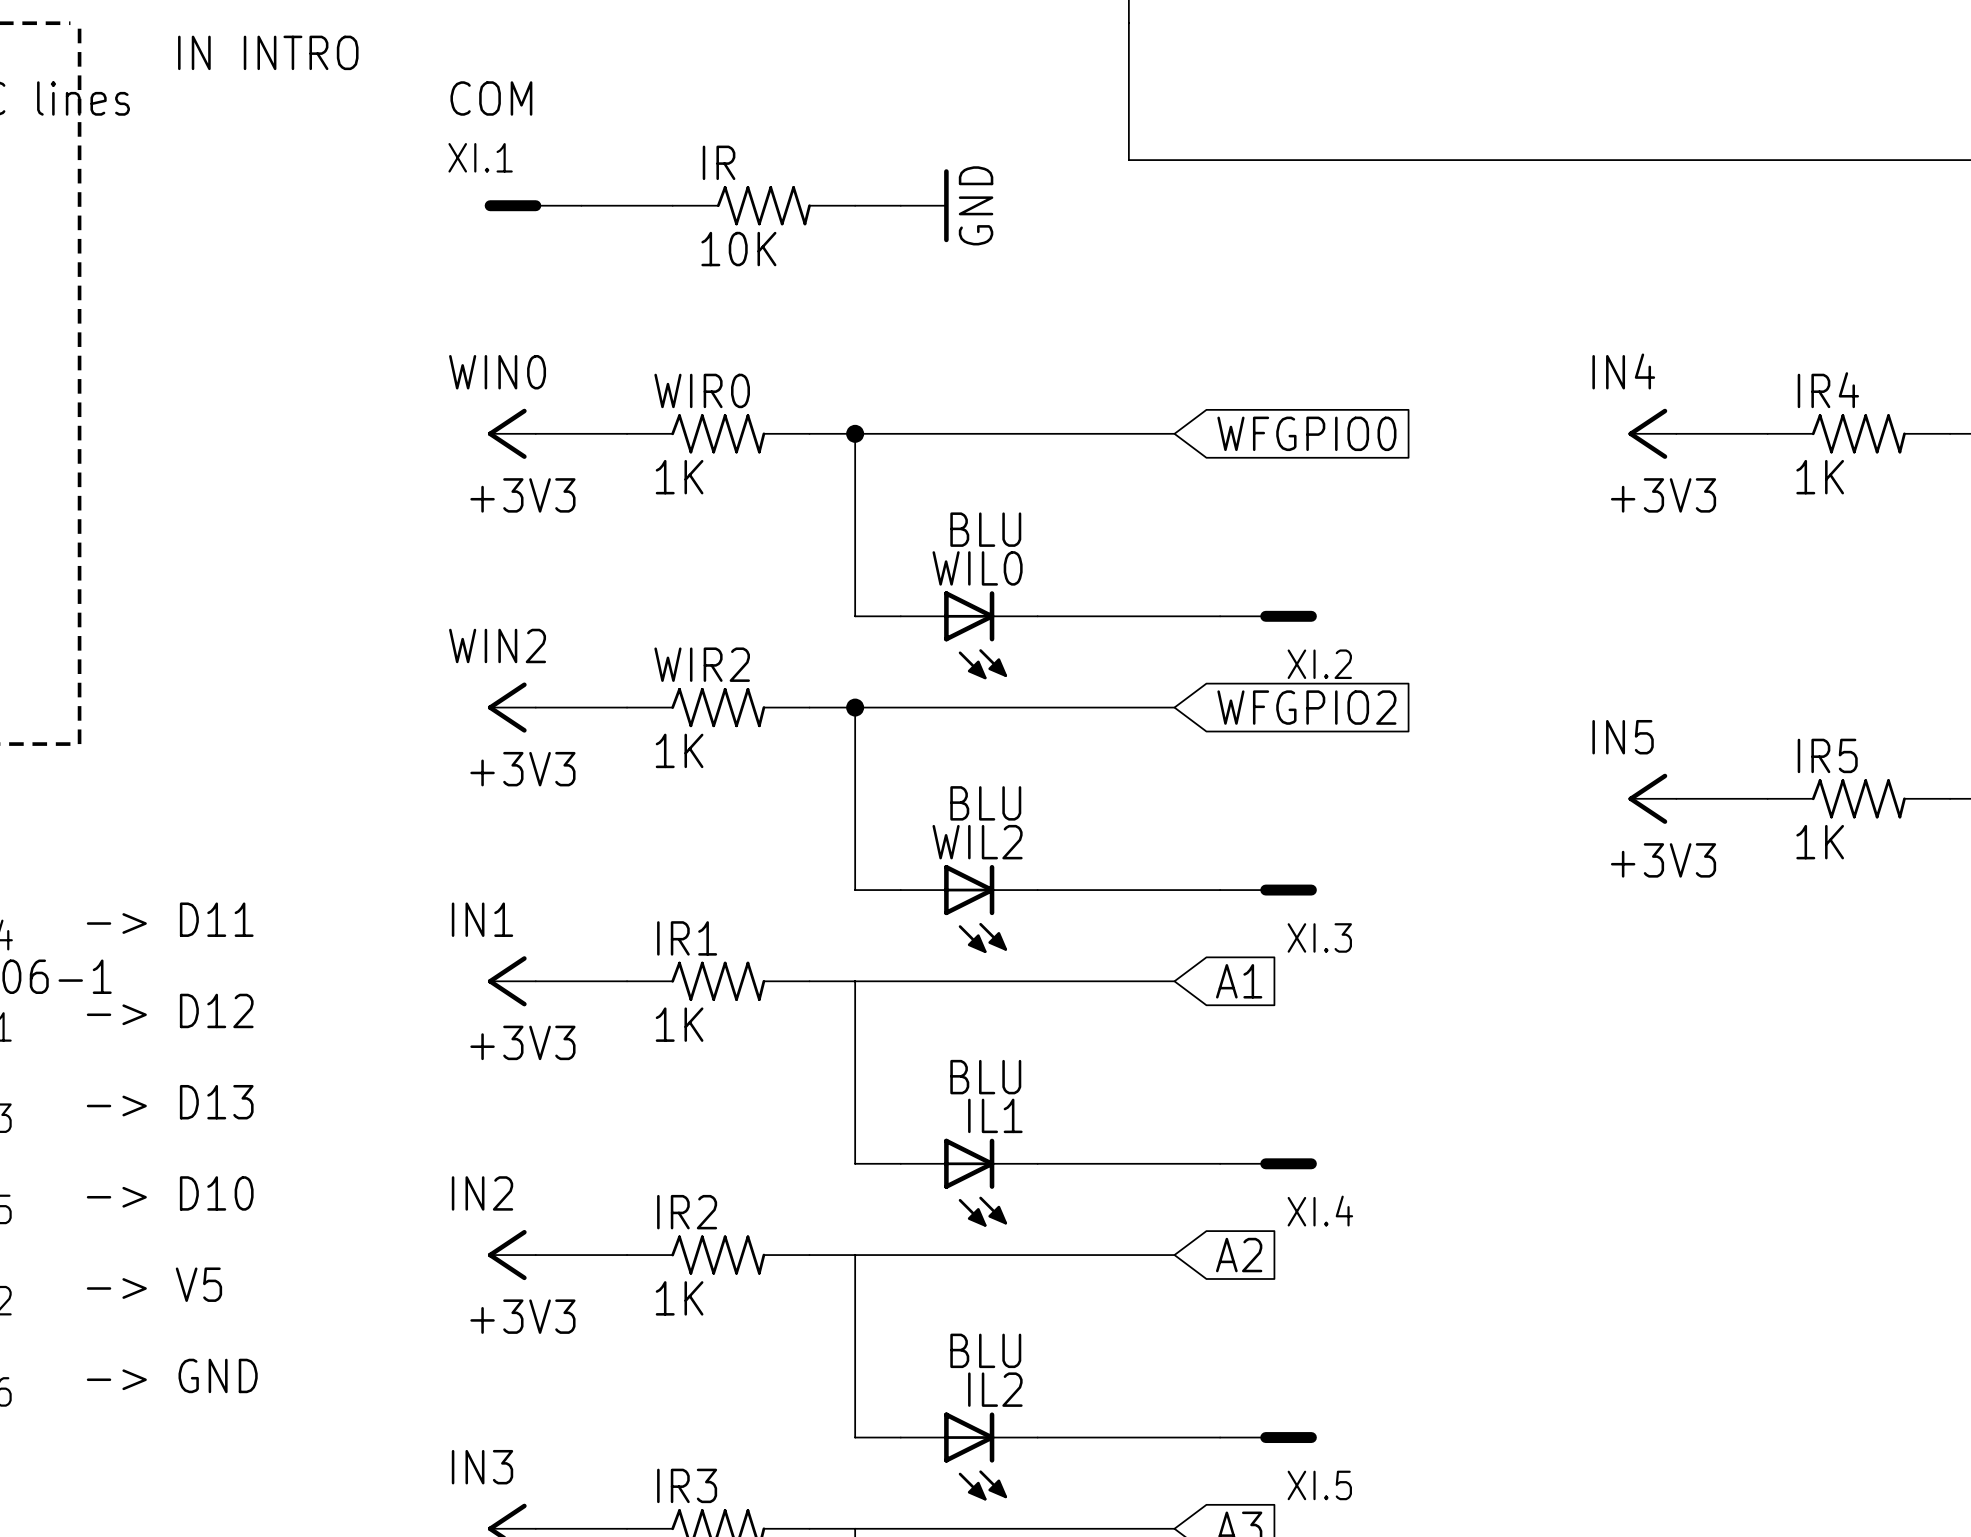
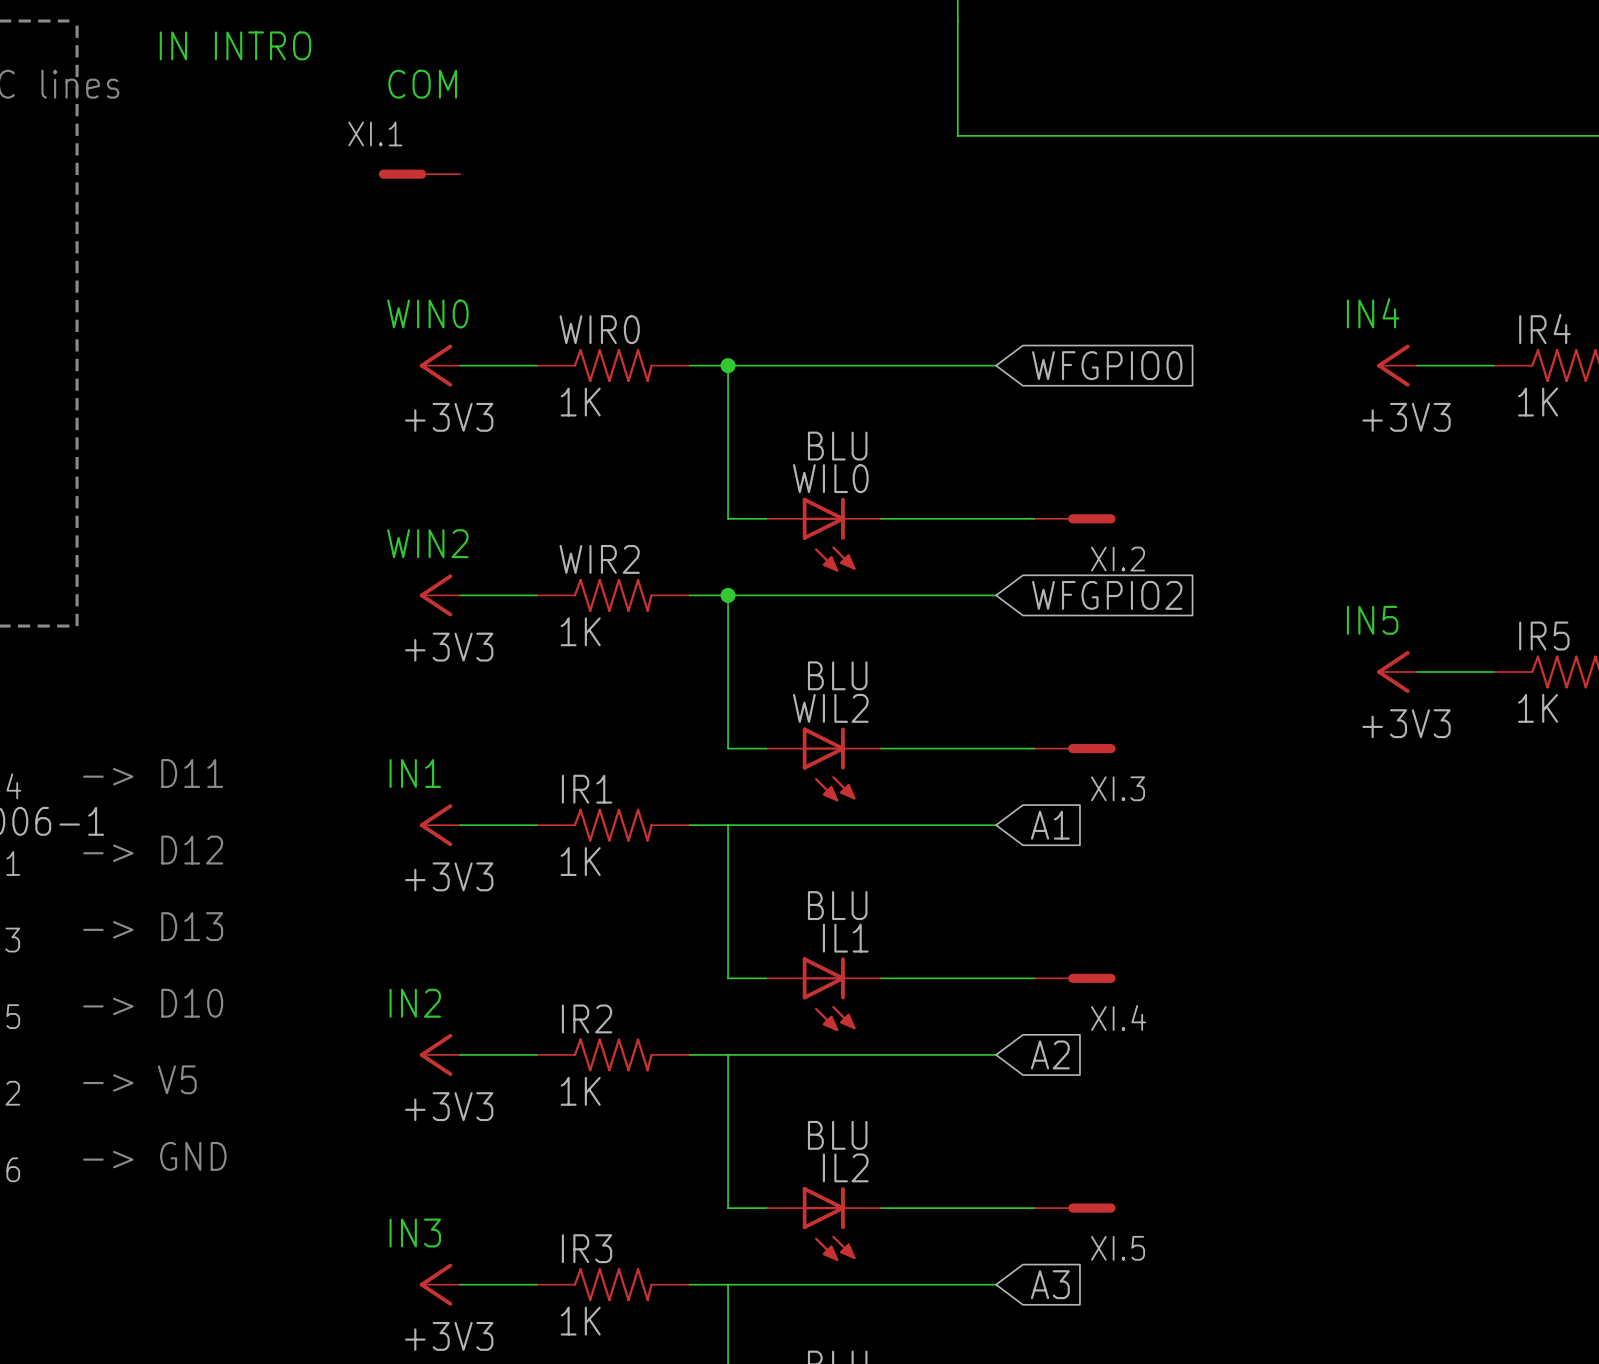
XI.1 position: (533, 205) -> (419, 174)
wire: (581, 205) (672, 205) -> none
IR: 10K (763, 205) -> none
wire: (855, 205) (900, 205) -> none
power symbol: GND (924, 205) -> none

